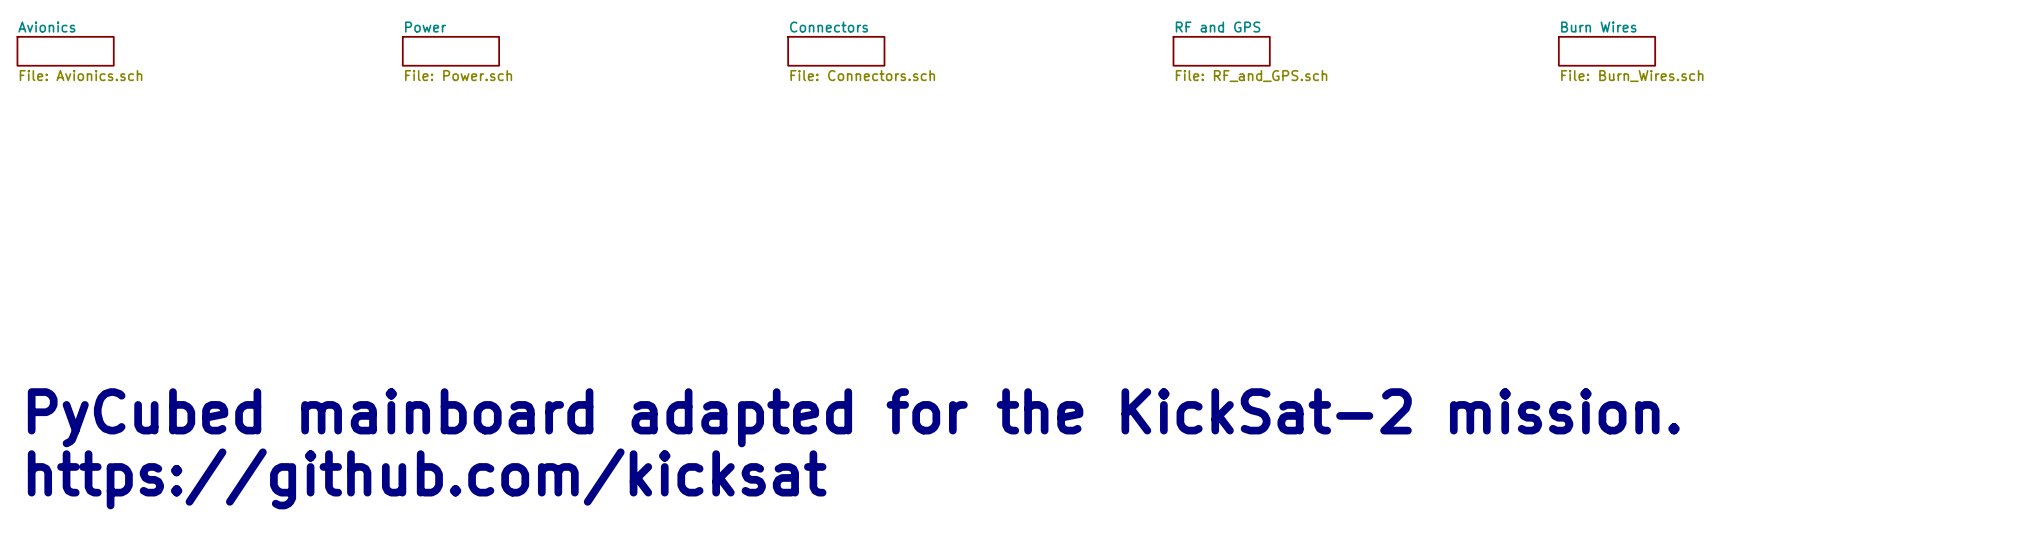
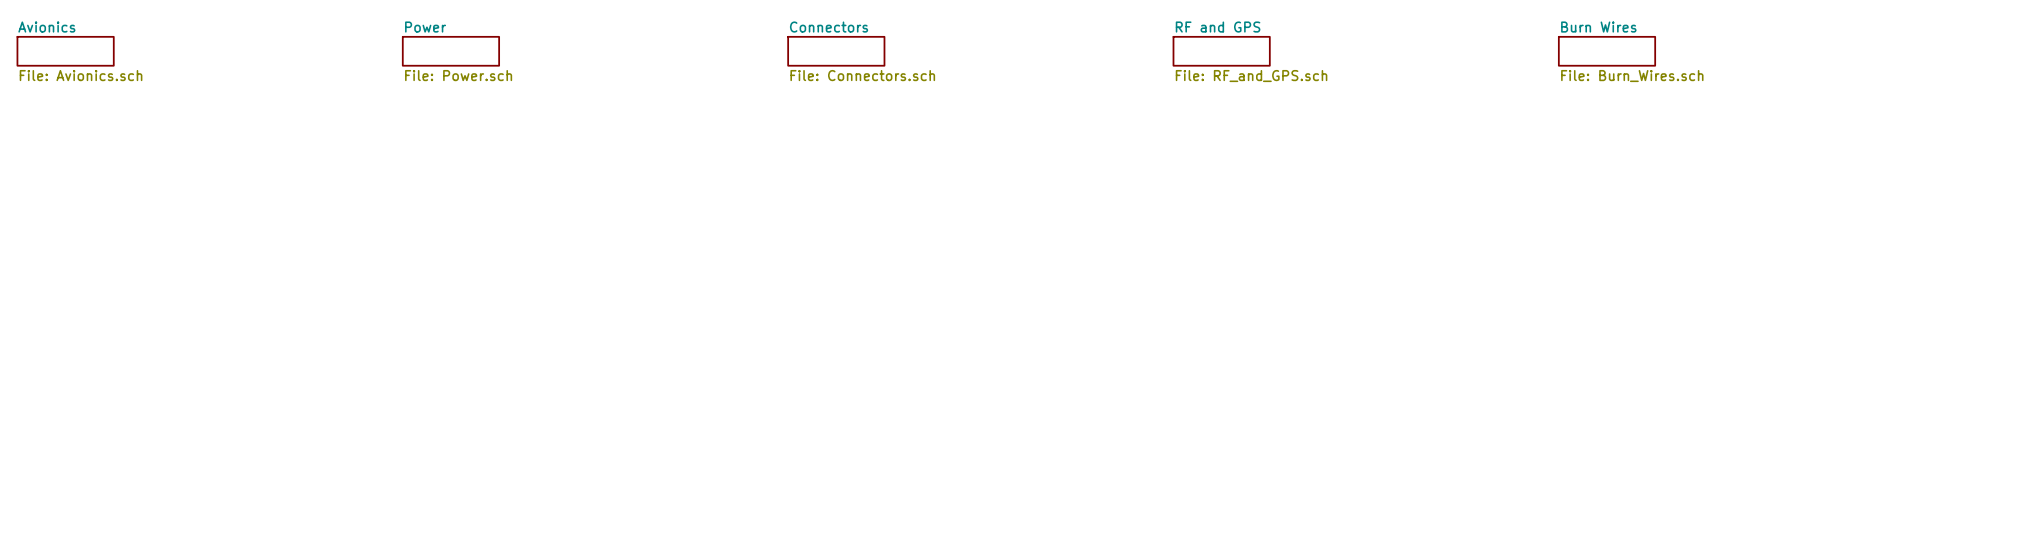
text: PyCubed mainboard adapted for the KickSat-2 mission. (853, 417) -> none
text: https://github.com/kicksat (427, 478) -> none

